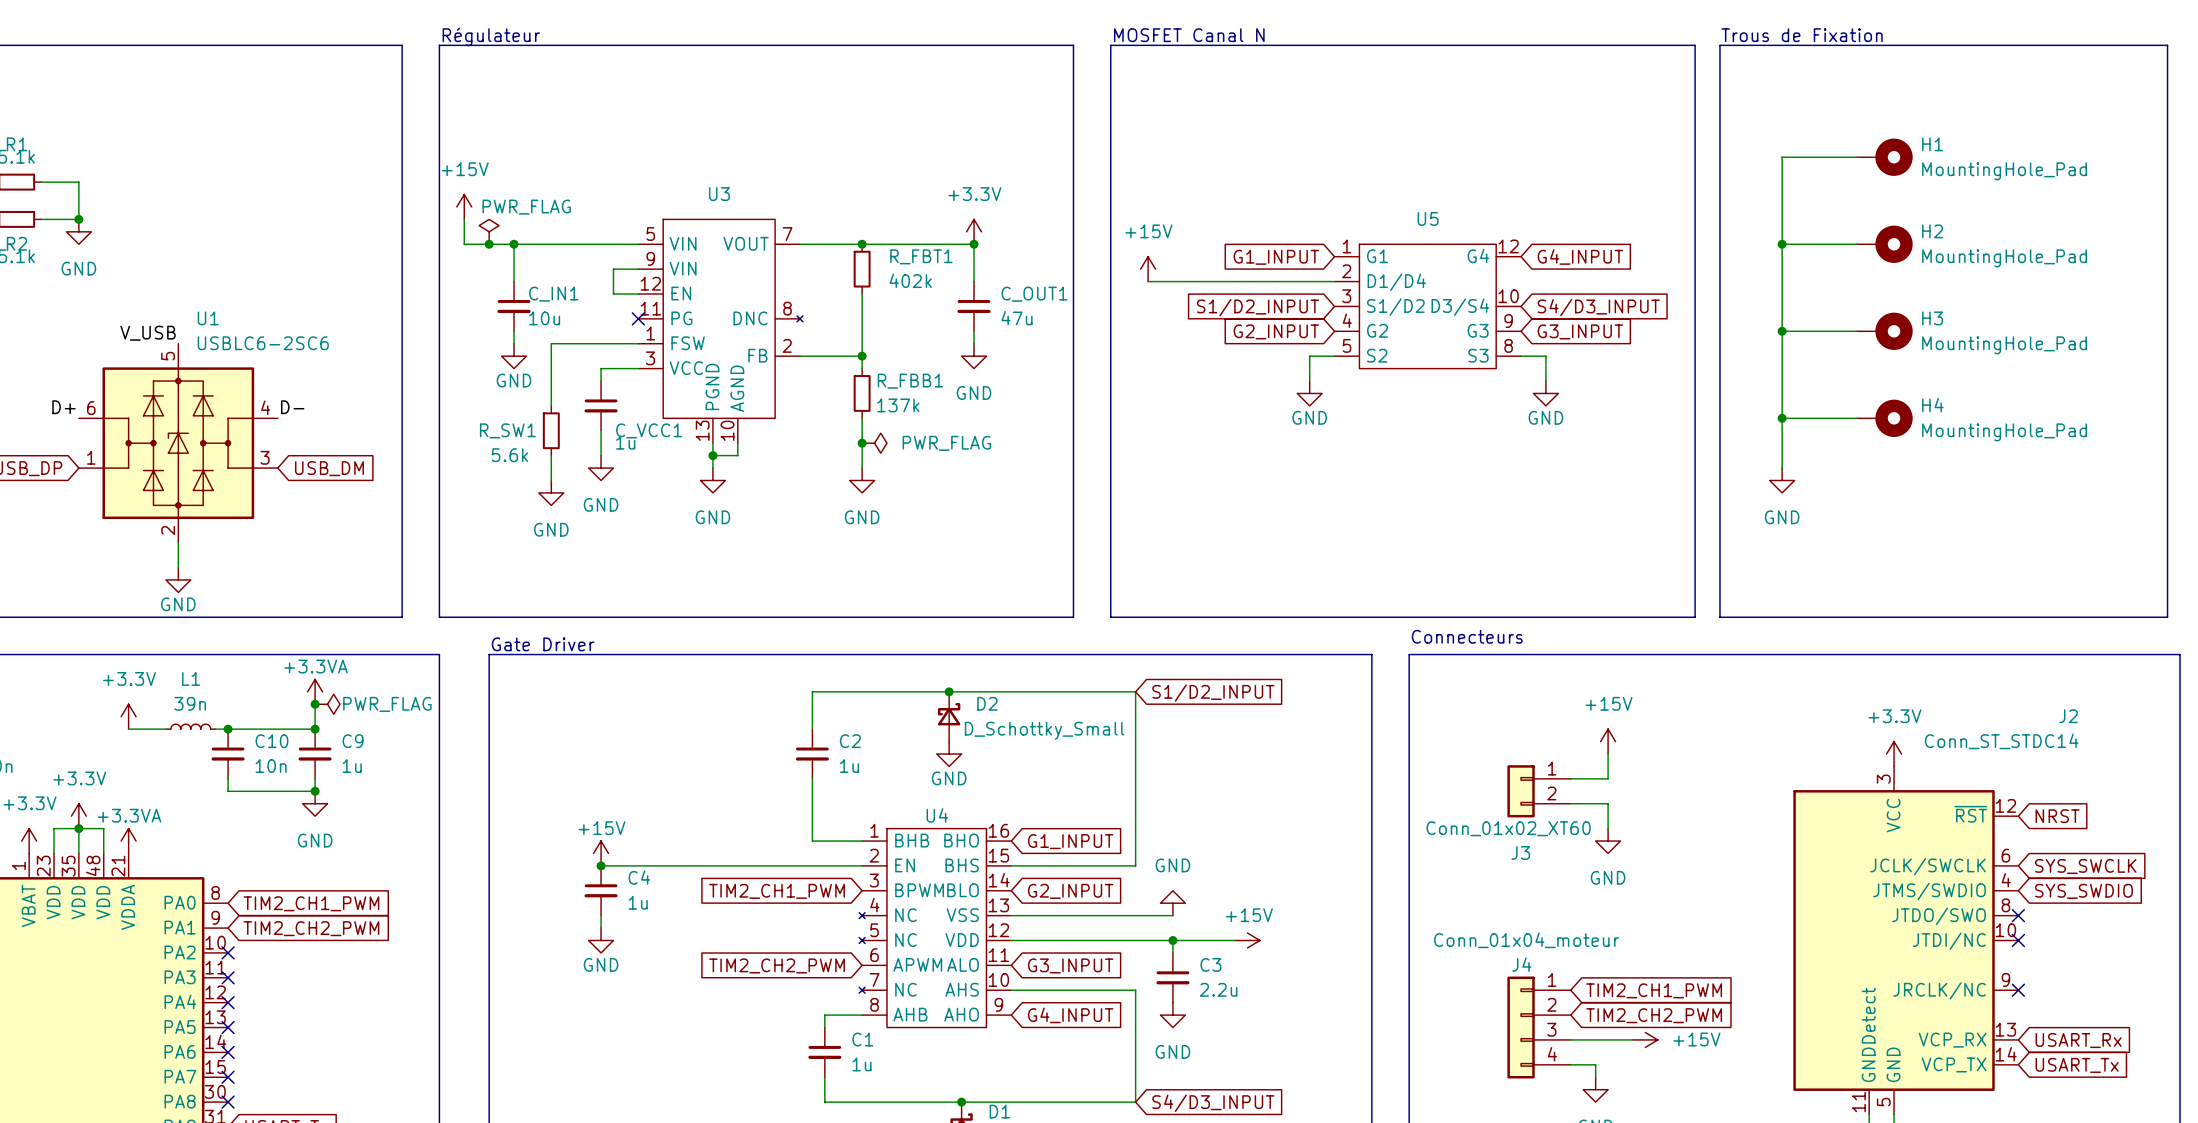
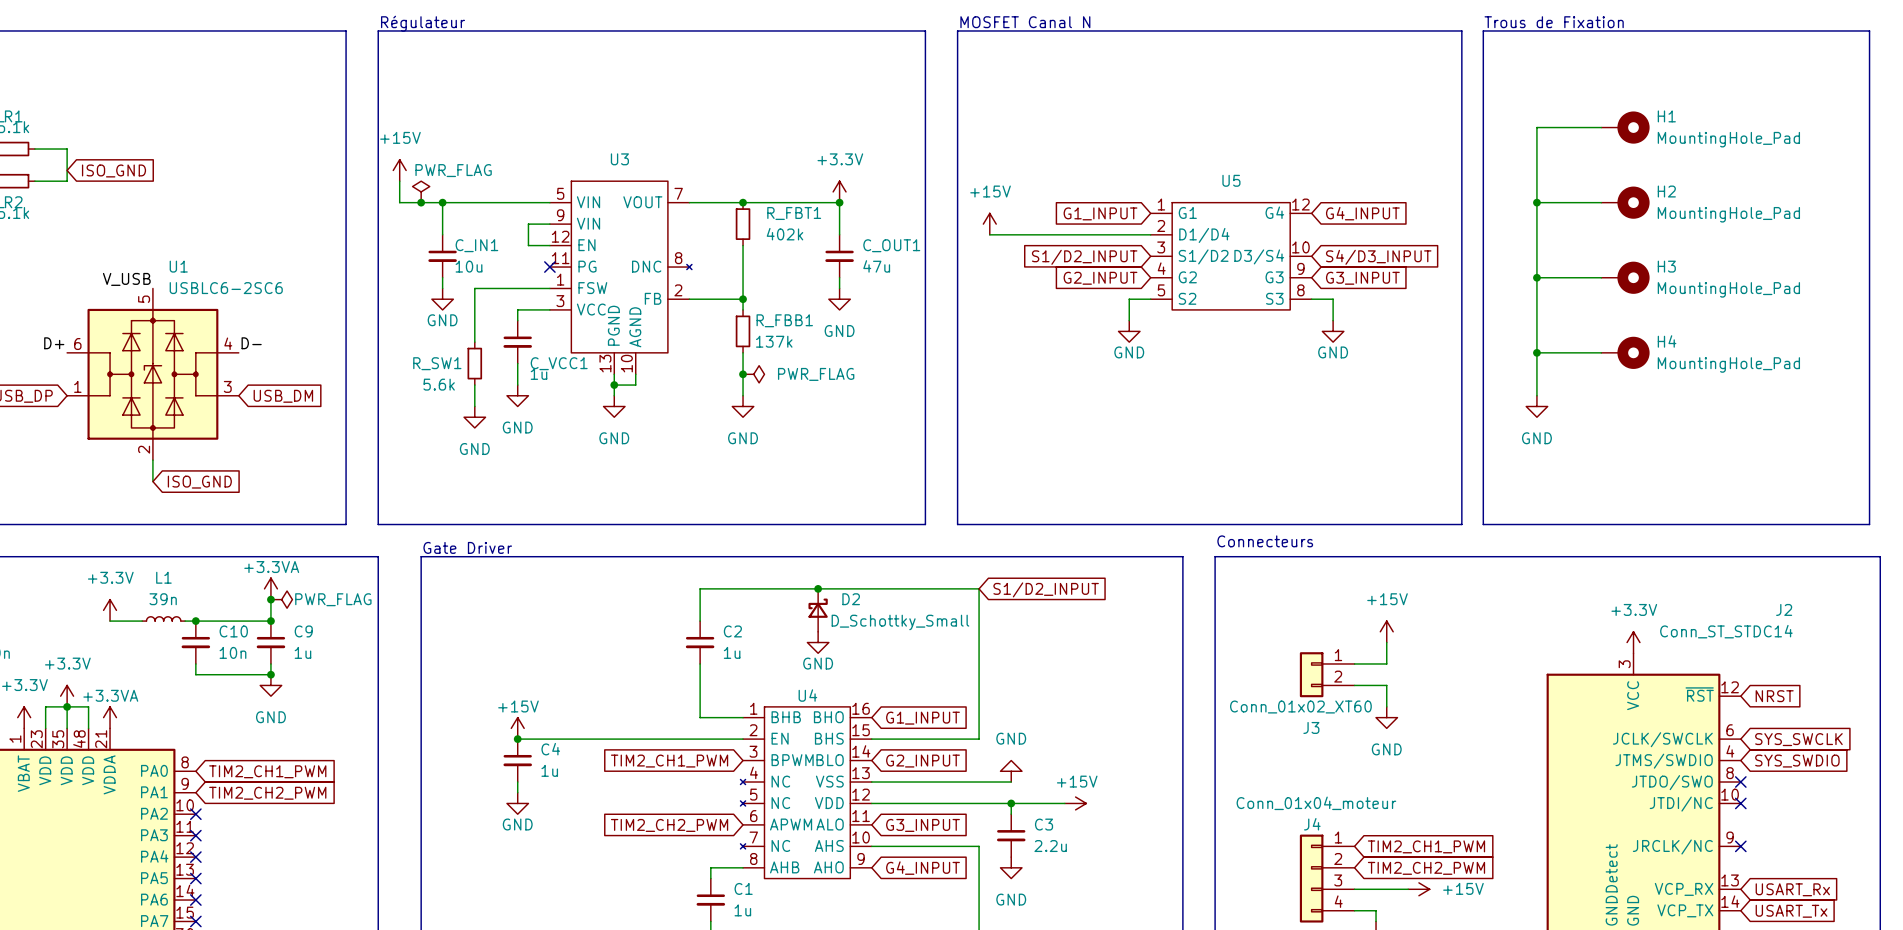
global label: none -> ISO_GND (114, 170)
junction: (78, 219) -> none
power symbol: GND (78, 231) -> none
global label: none -> ISO_GND (199, 482)
power symbol: GND (178, 579) -> none

